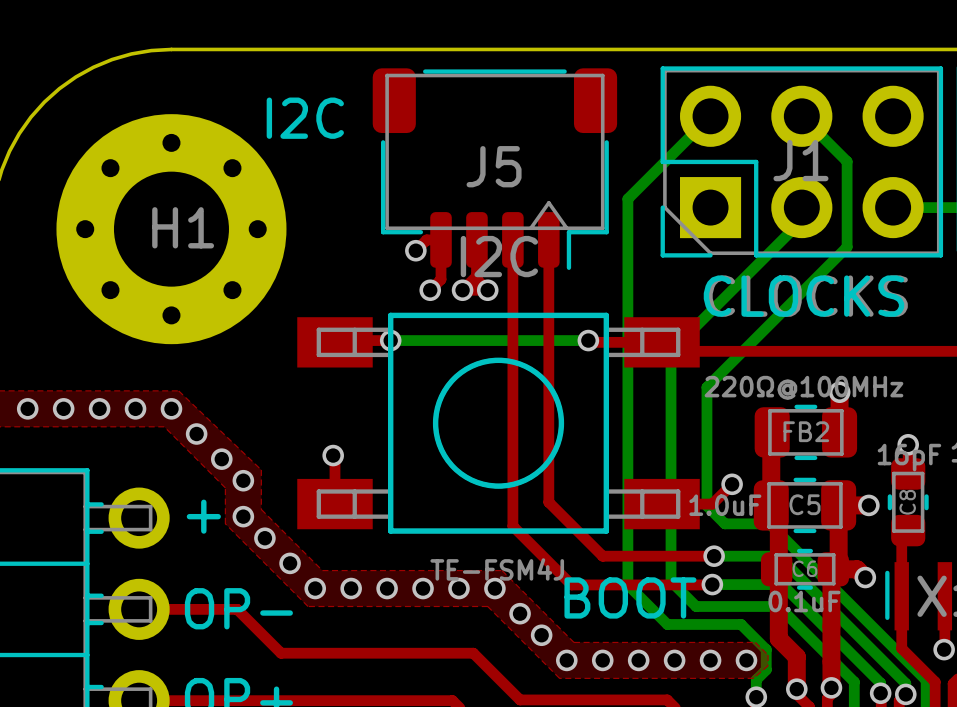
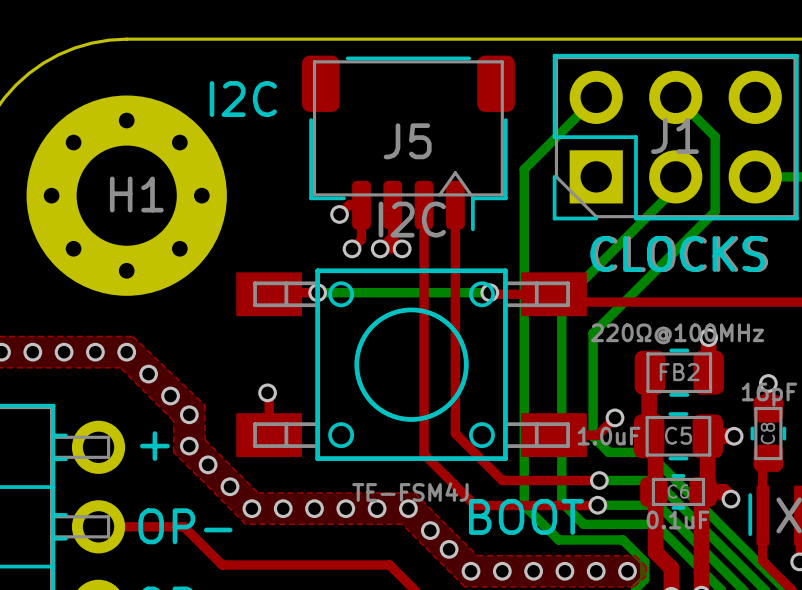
part footprint: [297, 312, 700, 534] -> [236, 268, 587, 461]

